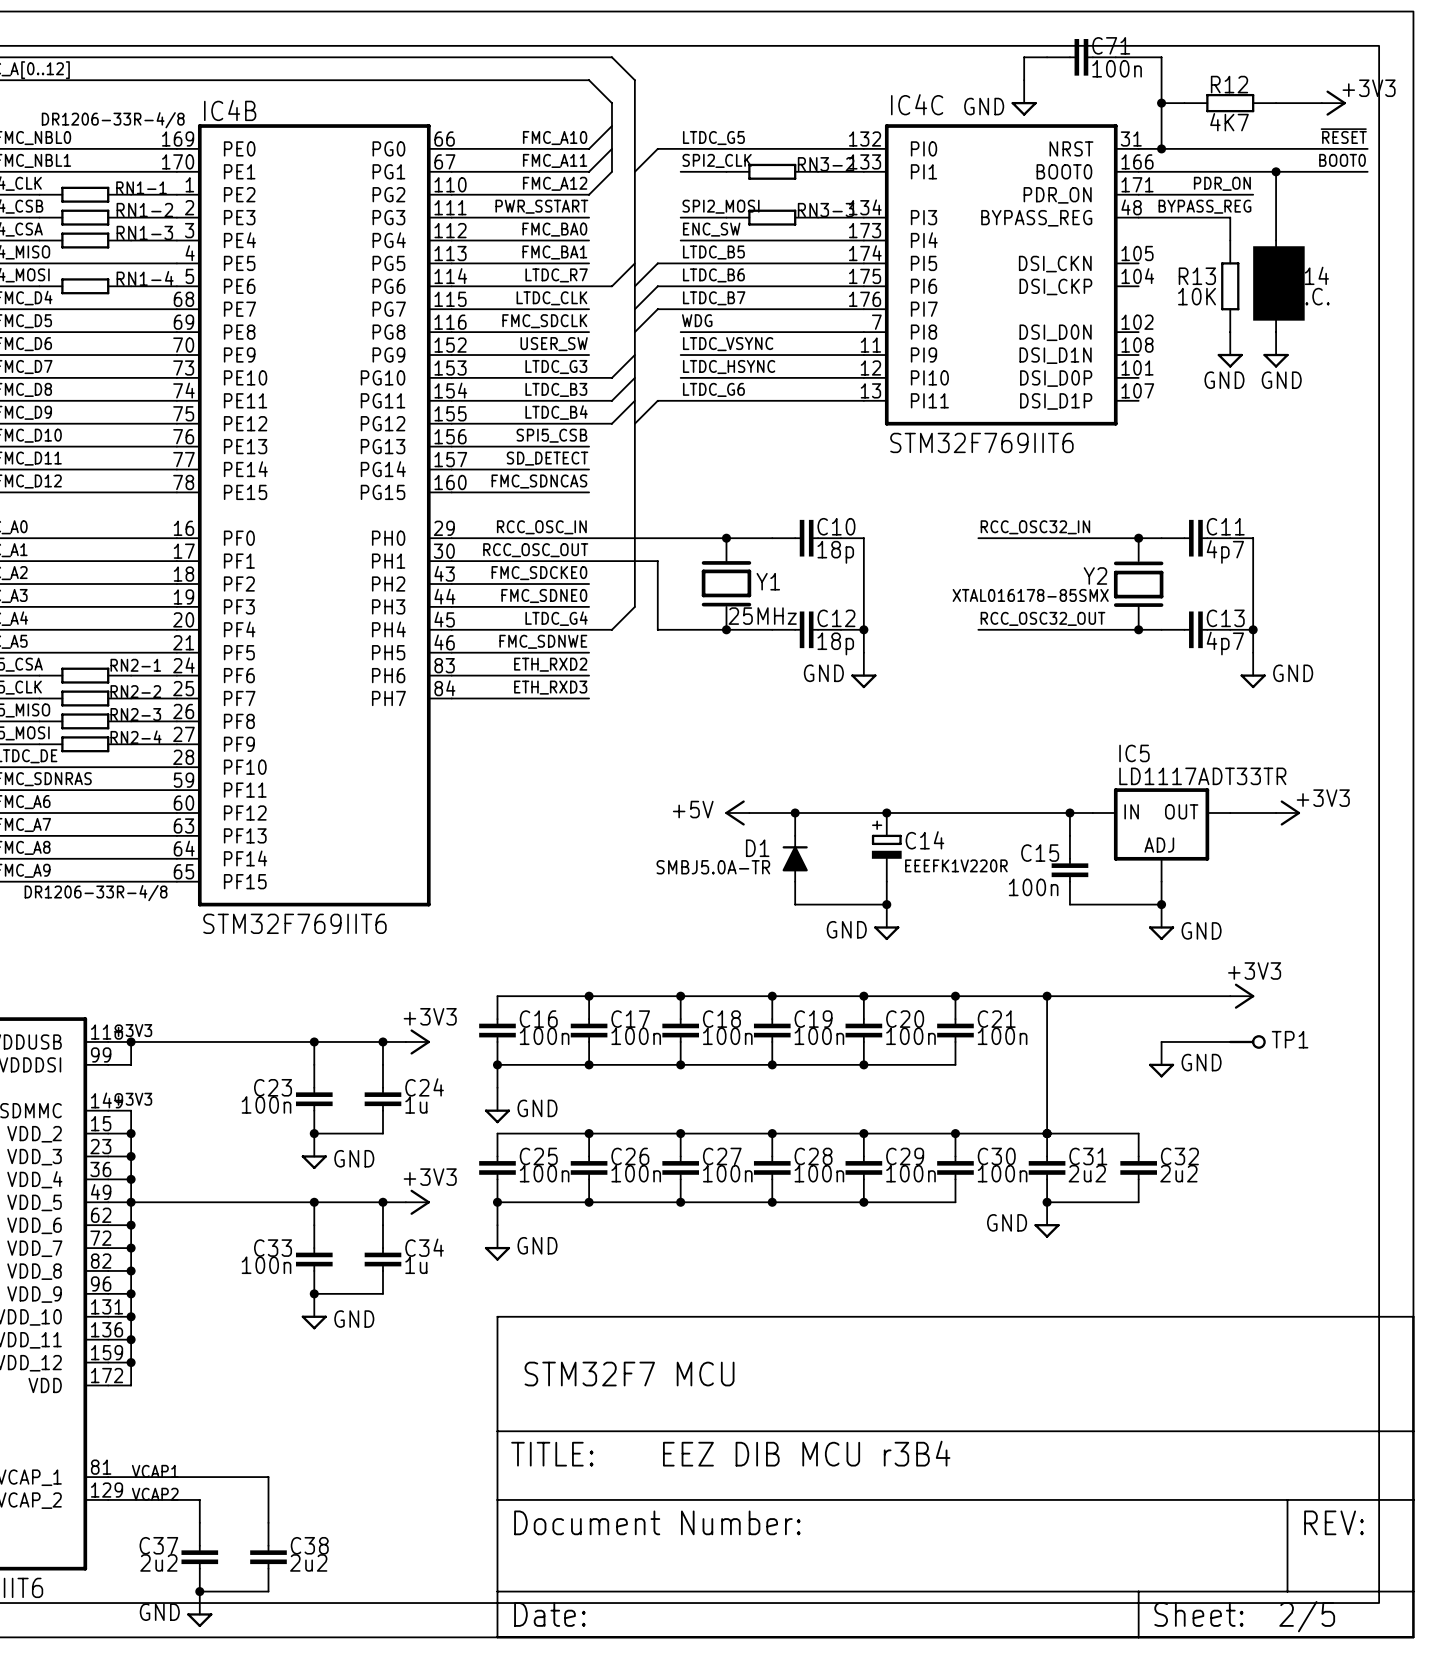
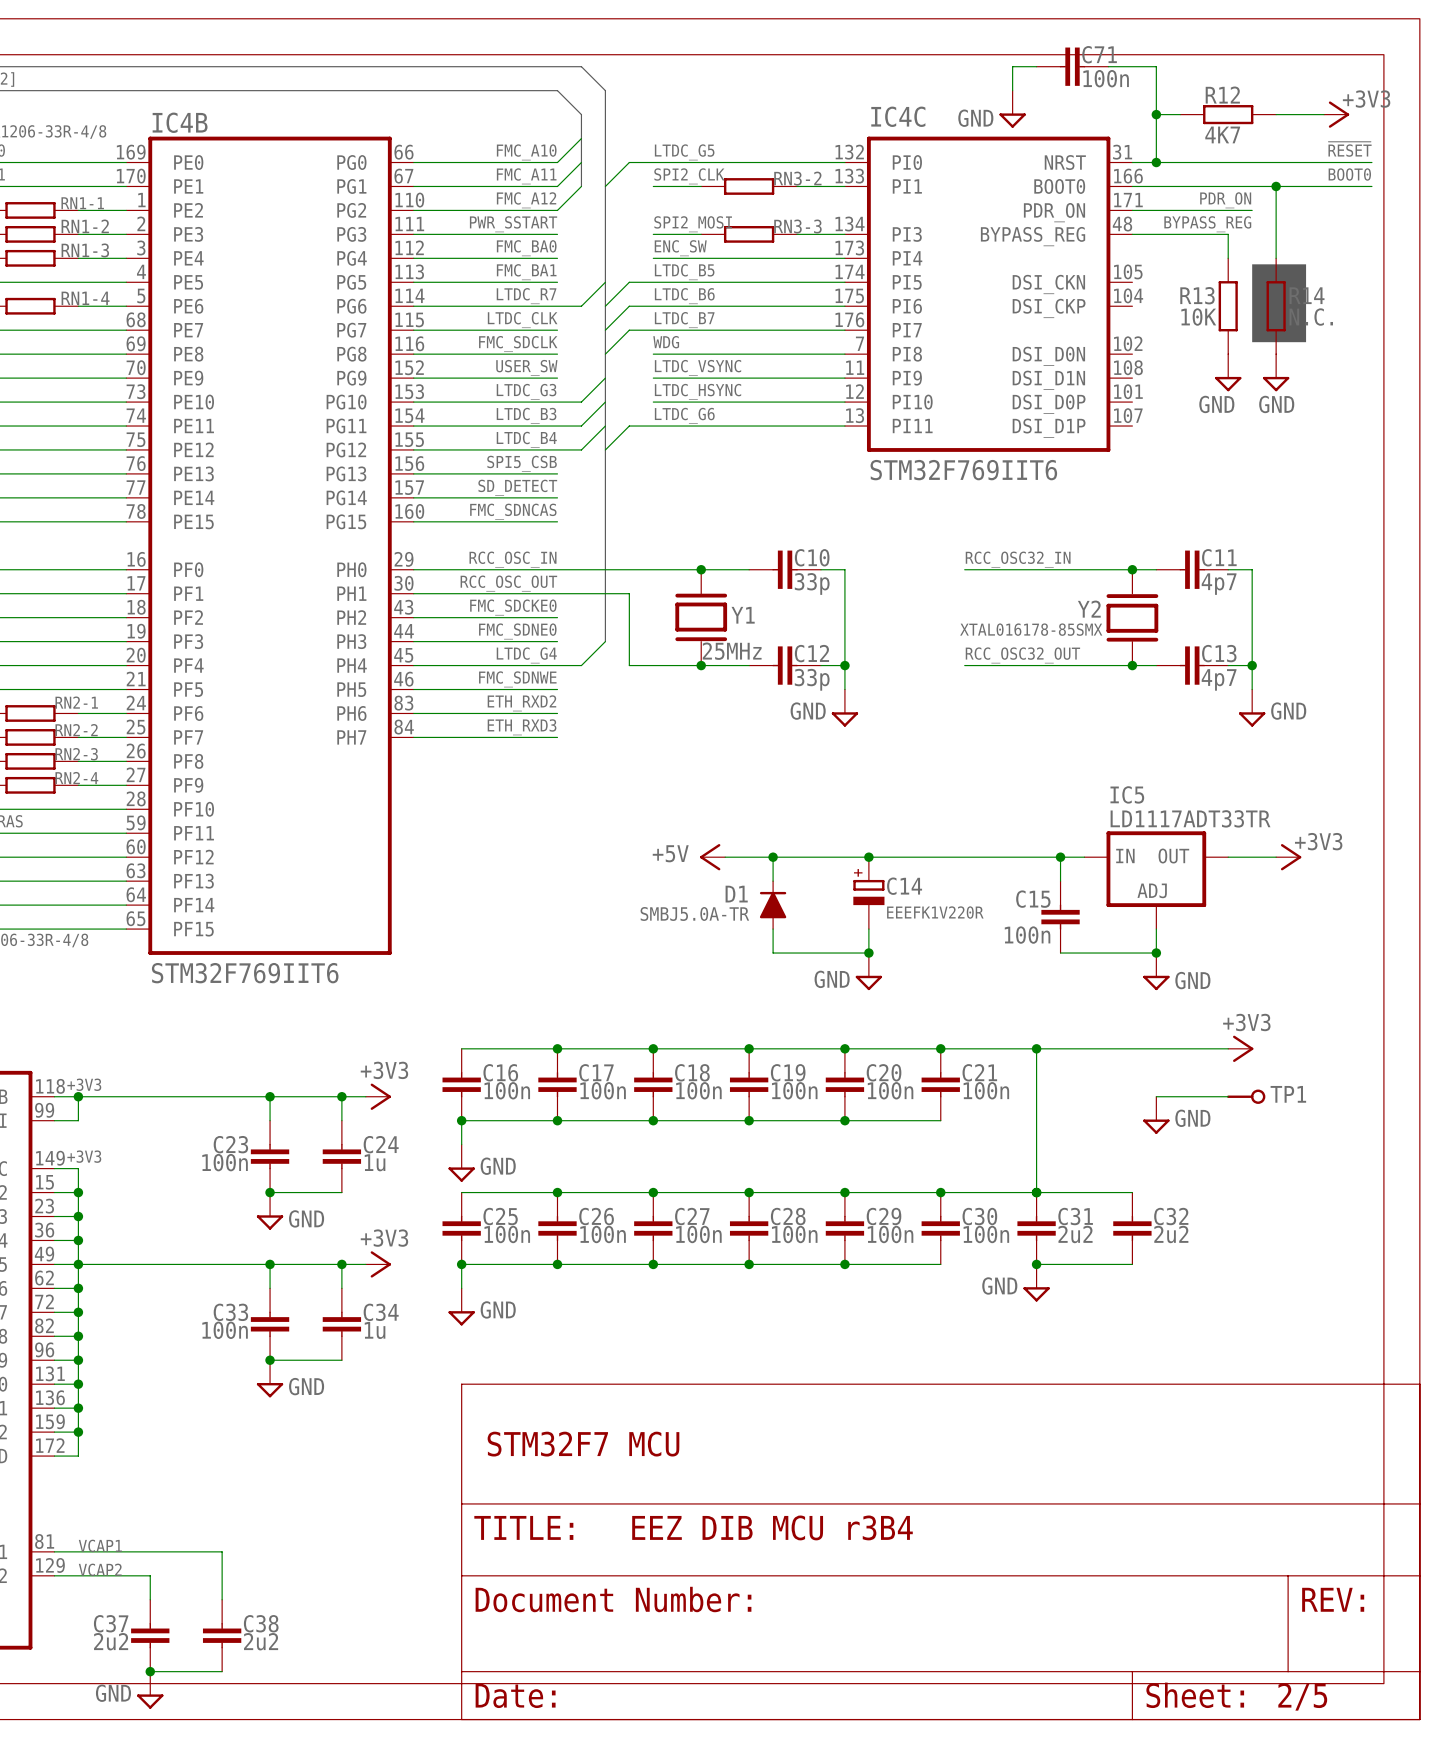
C10 value: 18p (835, 552) -> 33p (812, 583)
C12 value: 18p (835, 643) -> 33p (812, 679)

